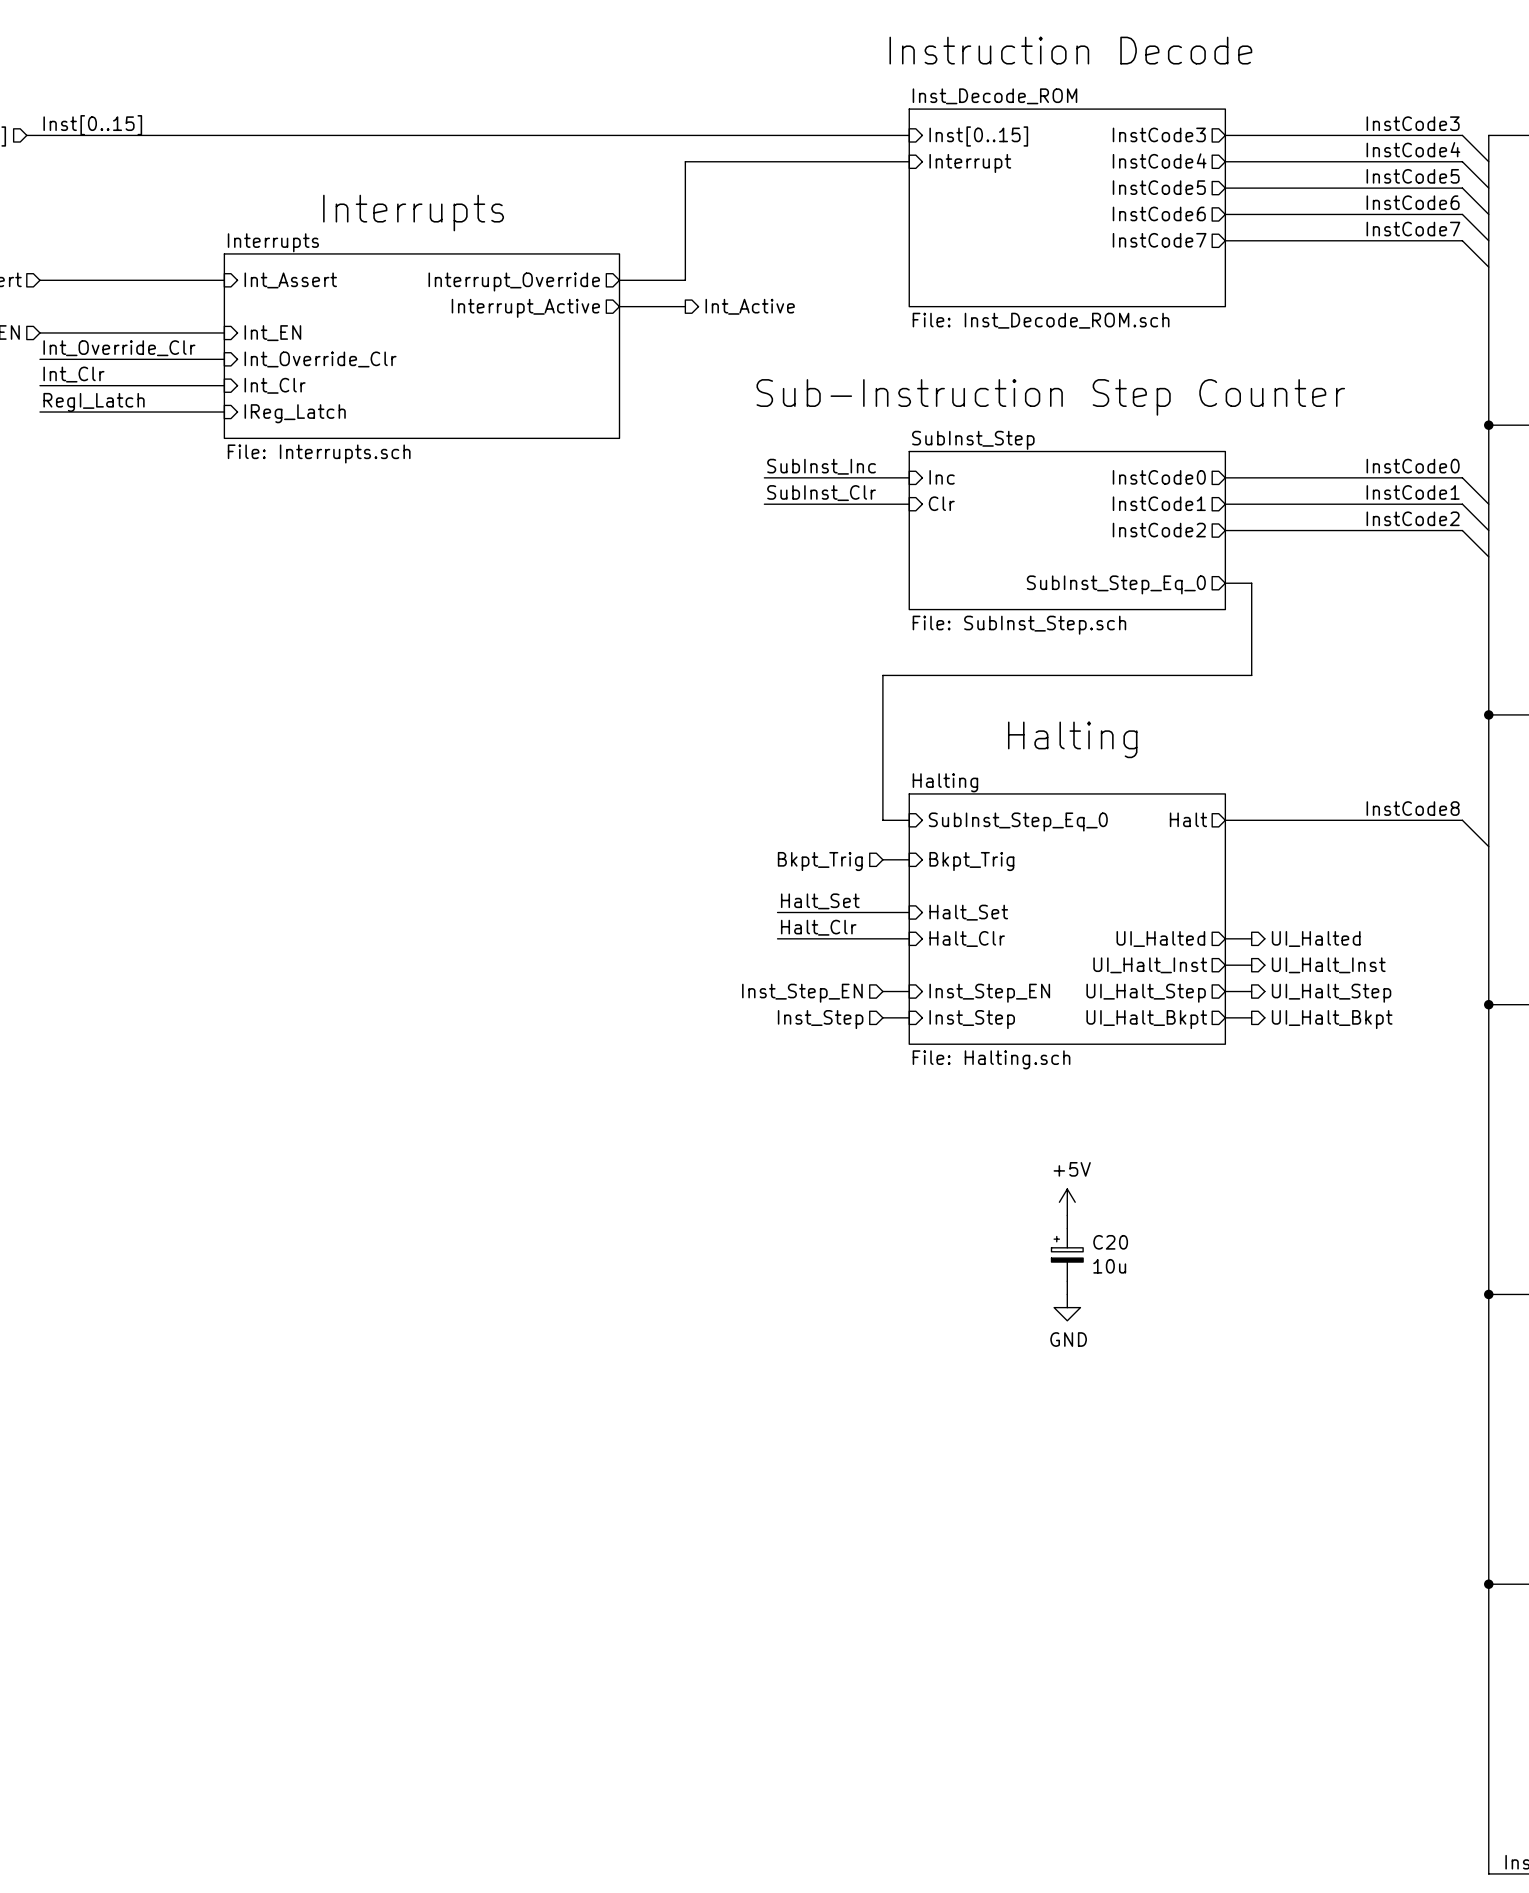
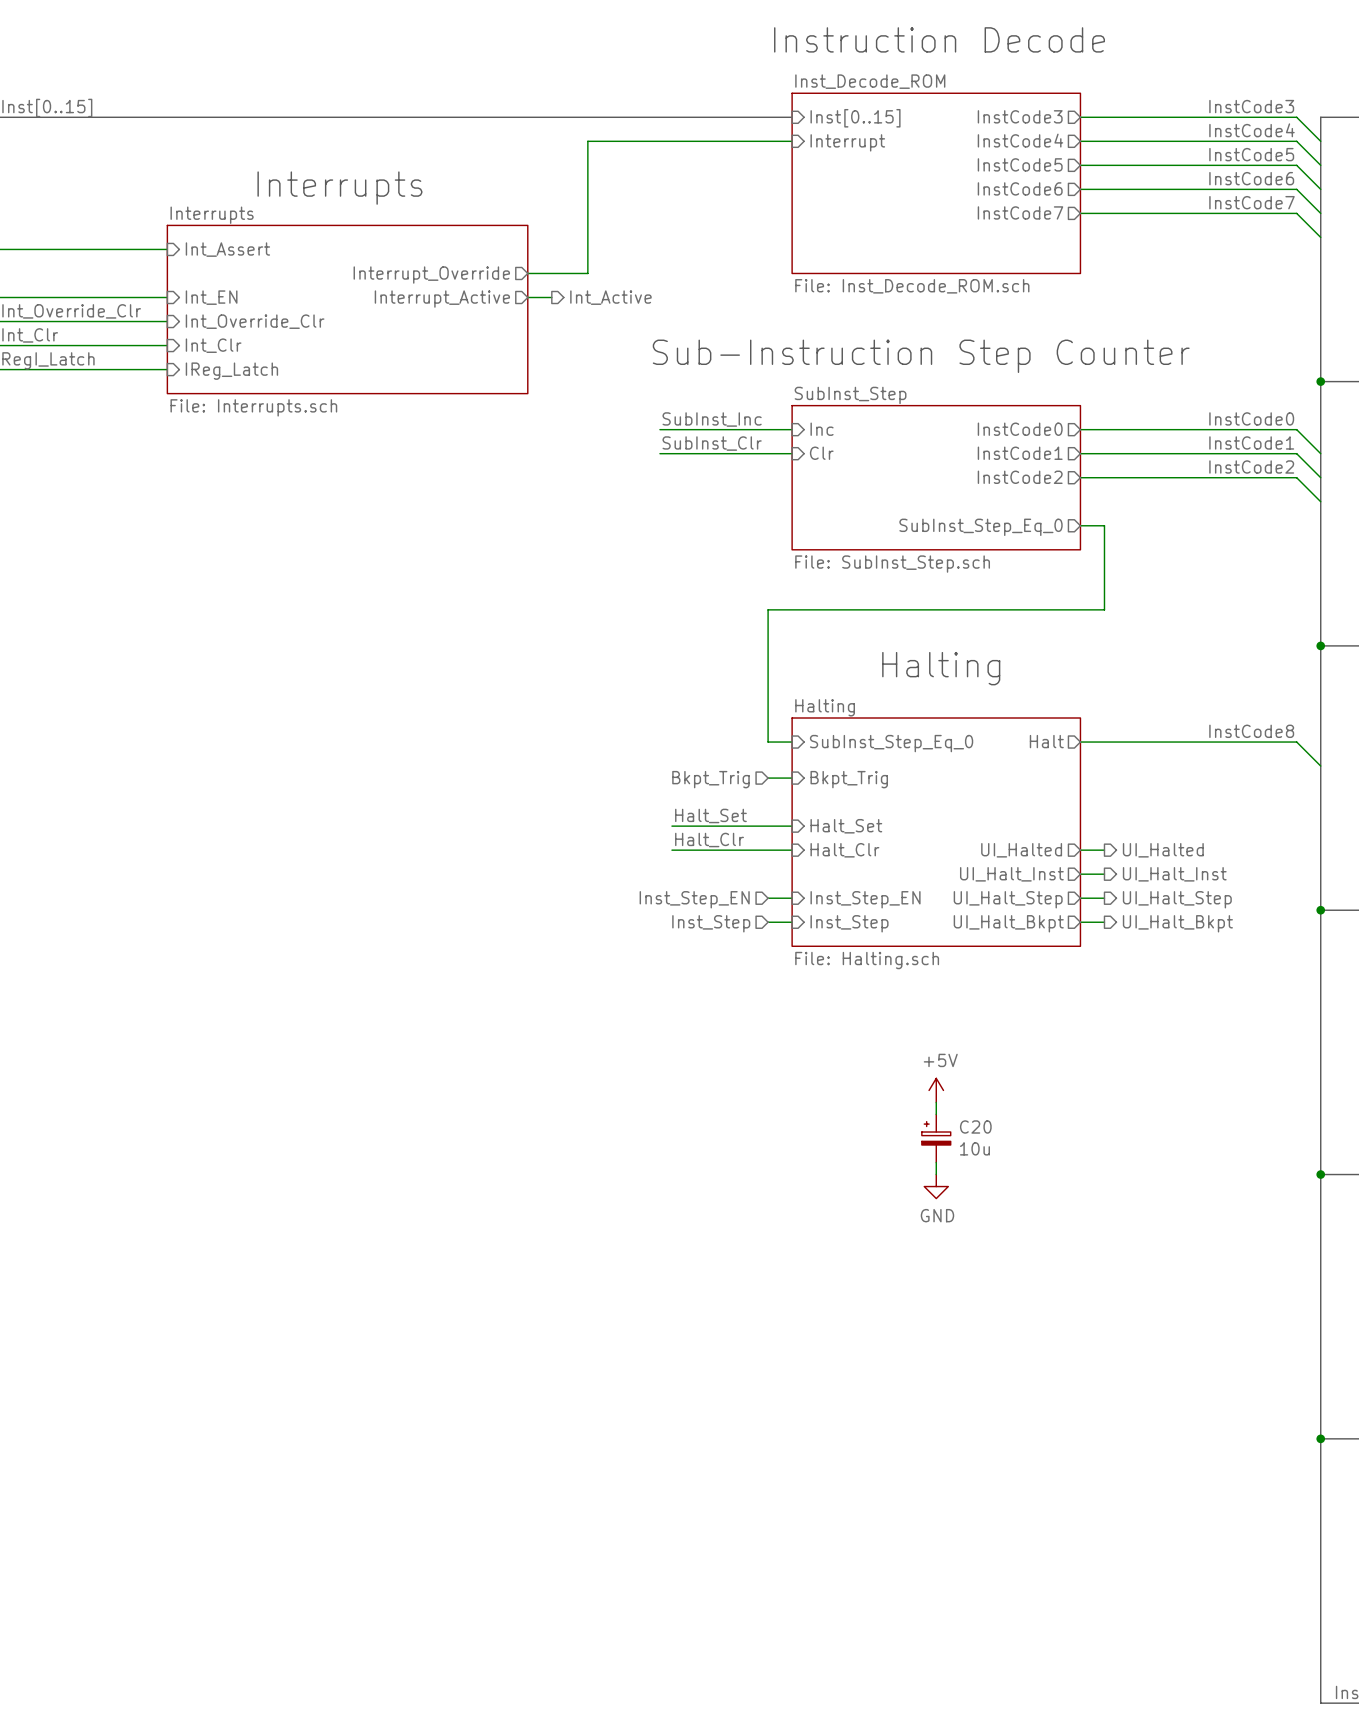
wire: (619, 280) (685, 280) -> (587, 273) (587, 249)
sheet pin: Interrupt_Override (514, 282) -> none
hierarchical label position: Int_Active (750, 306) -> Int_Active (610, 297)
sheet pin: Interrupt_Active (525, 308) -> Interrupt_Override (431, 275)
wire: none -> (527, 297) (551, 297)
sheet pin: none -> Interrupt_Active (442, 299)

